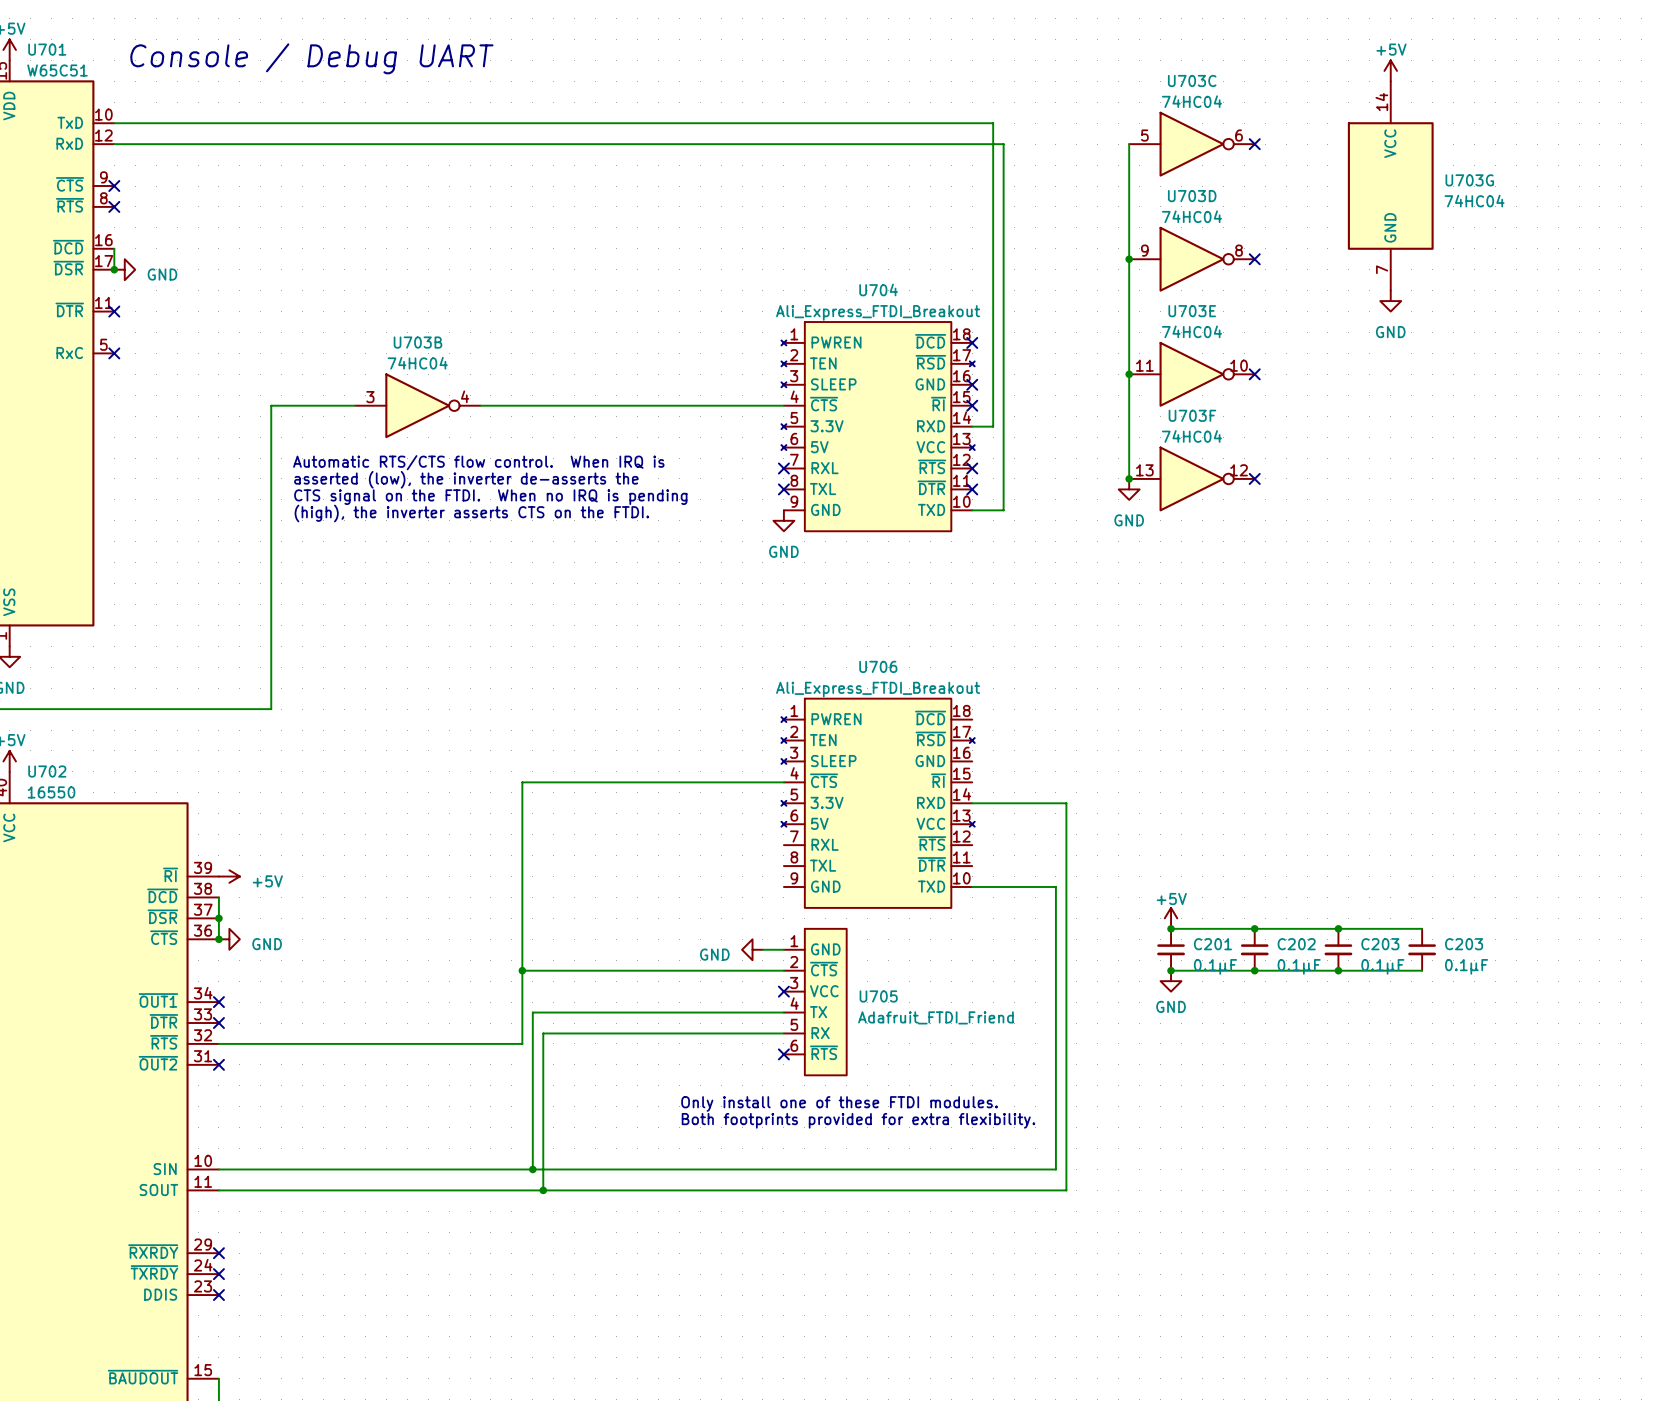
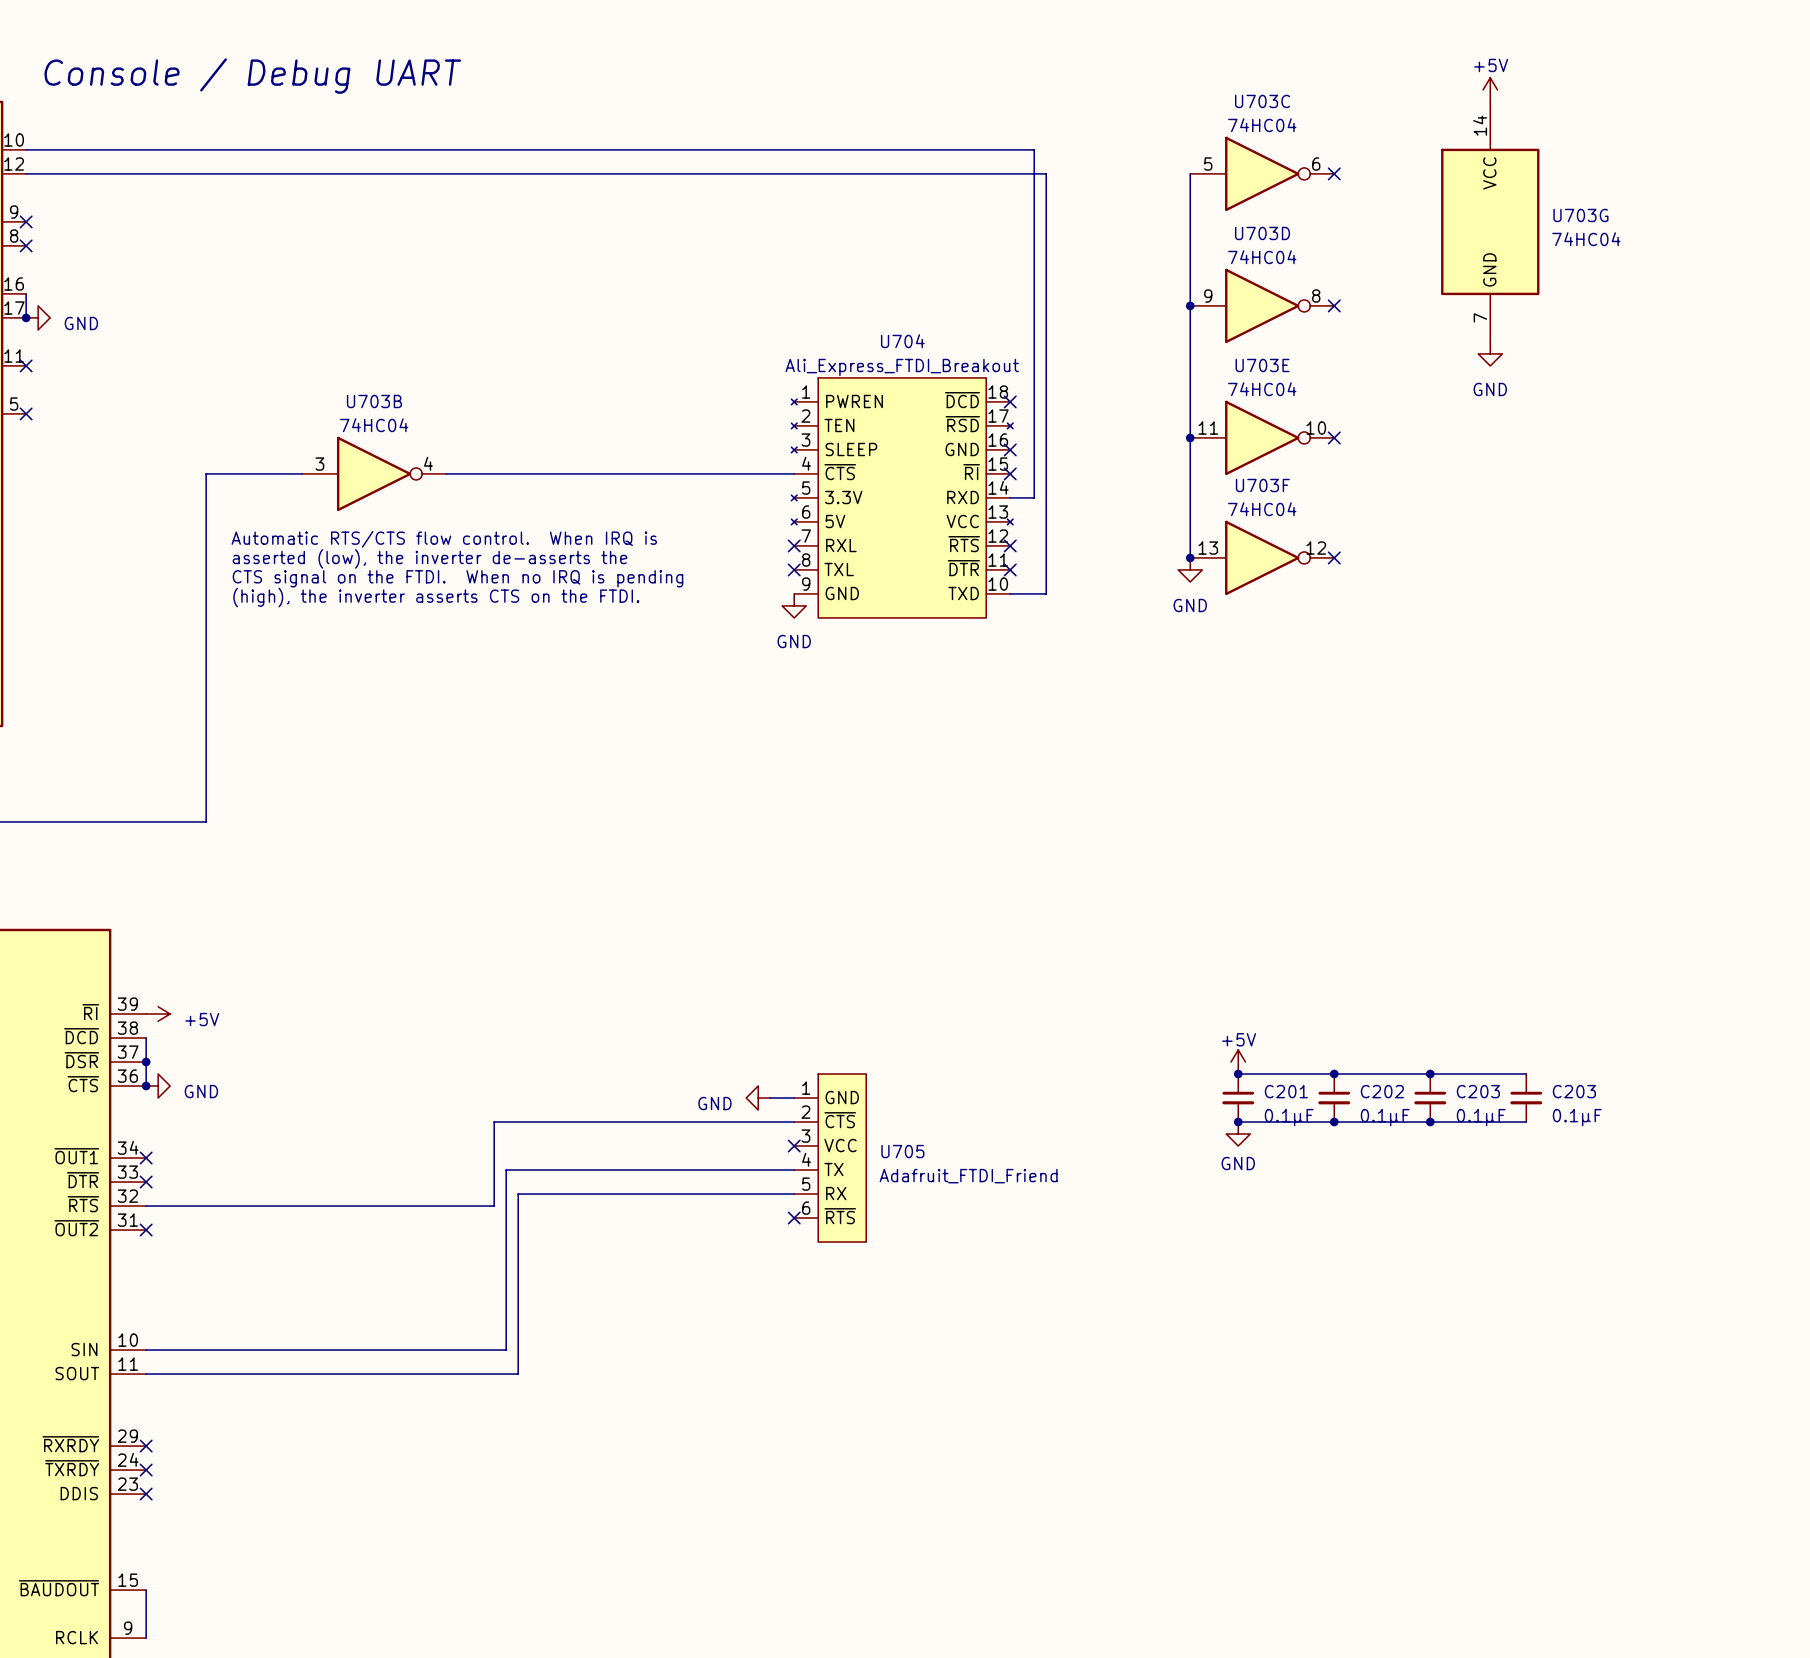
wire: (783, 782) (522, 782) (522, 970) -> none
U706: Ali_Express_FTDI_Breakout (878, 803) -> none
wire: (972, 803) (1066, 803) (1066, 1190) (543, 1190) -> none
wire: (972, 886) (1055, 886) (1055, 1169) (532, 1169) -> none
junction: (522, 970) -> none
text: Only install one of these FTDI modules. (839, 1103) -> none
text: Both footprints provided for extra flexibility. (858, 1120) -> none
junction: (532, 1169) -> none
junction: (543, 1190) -> none

